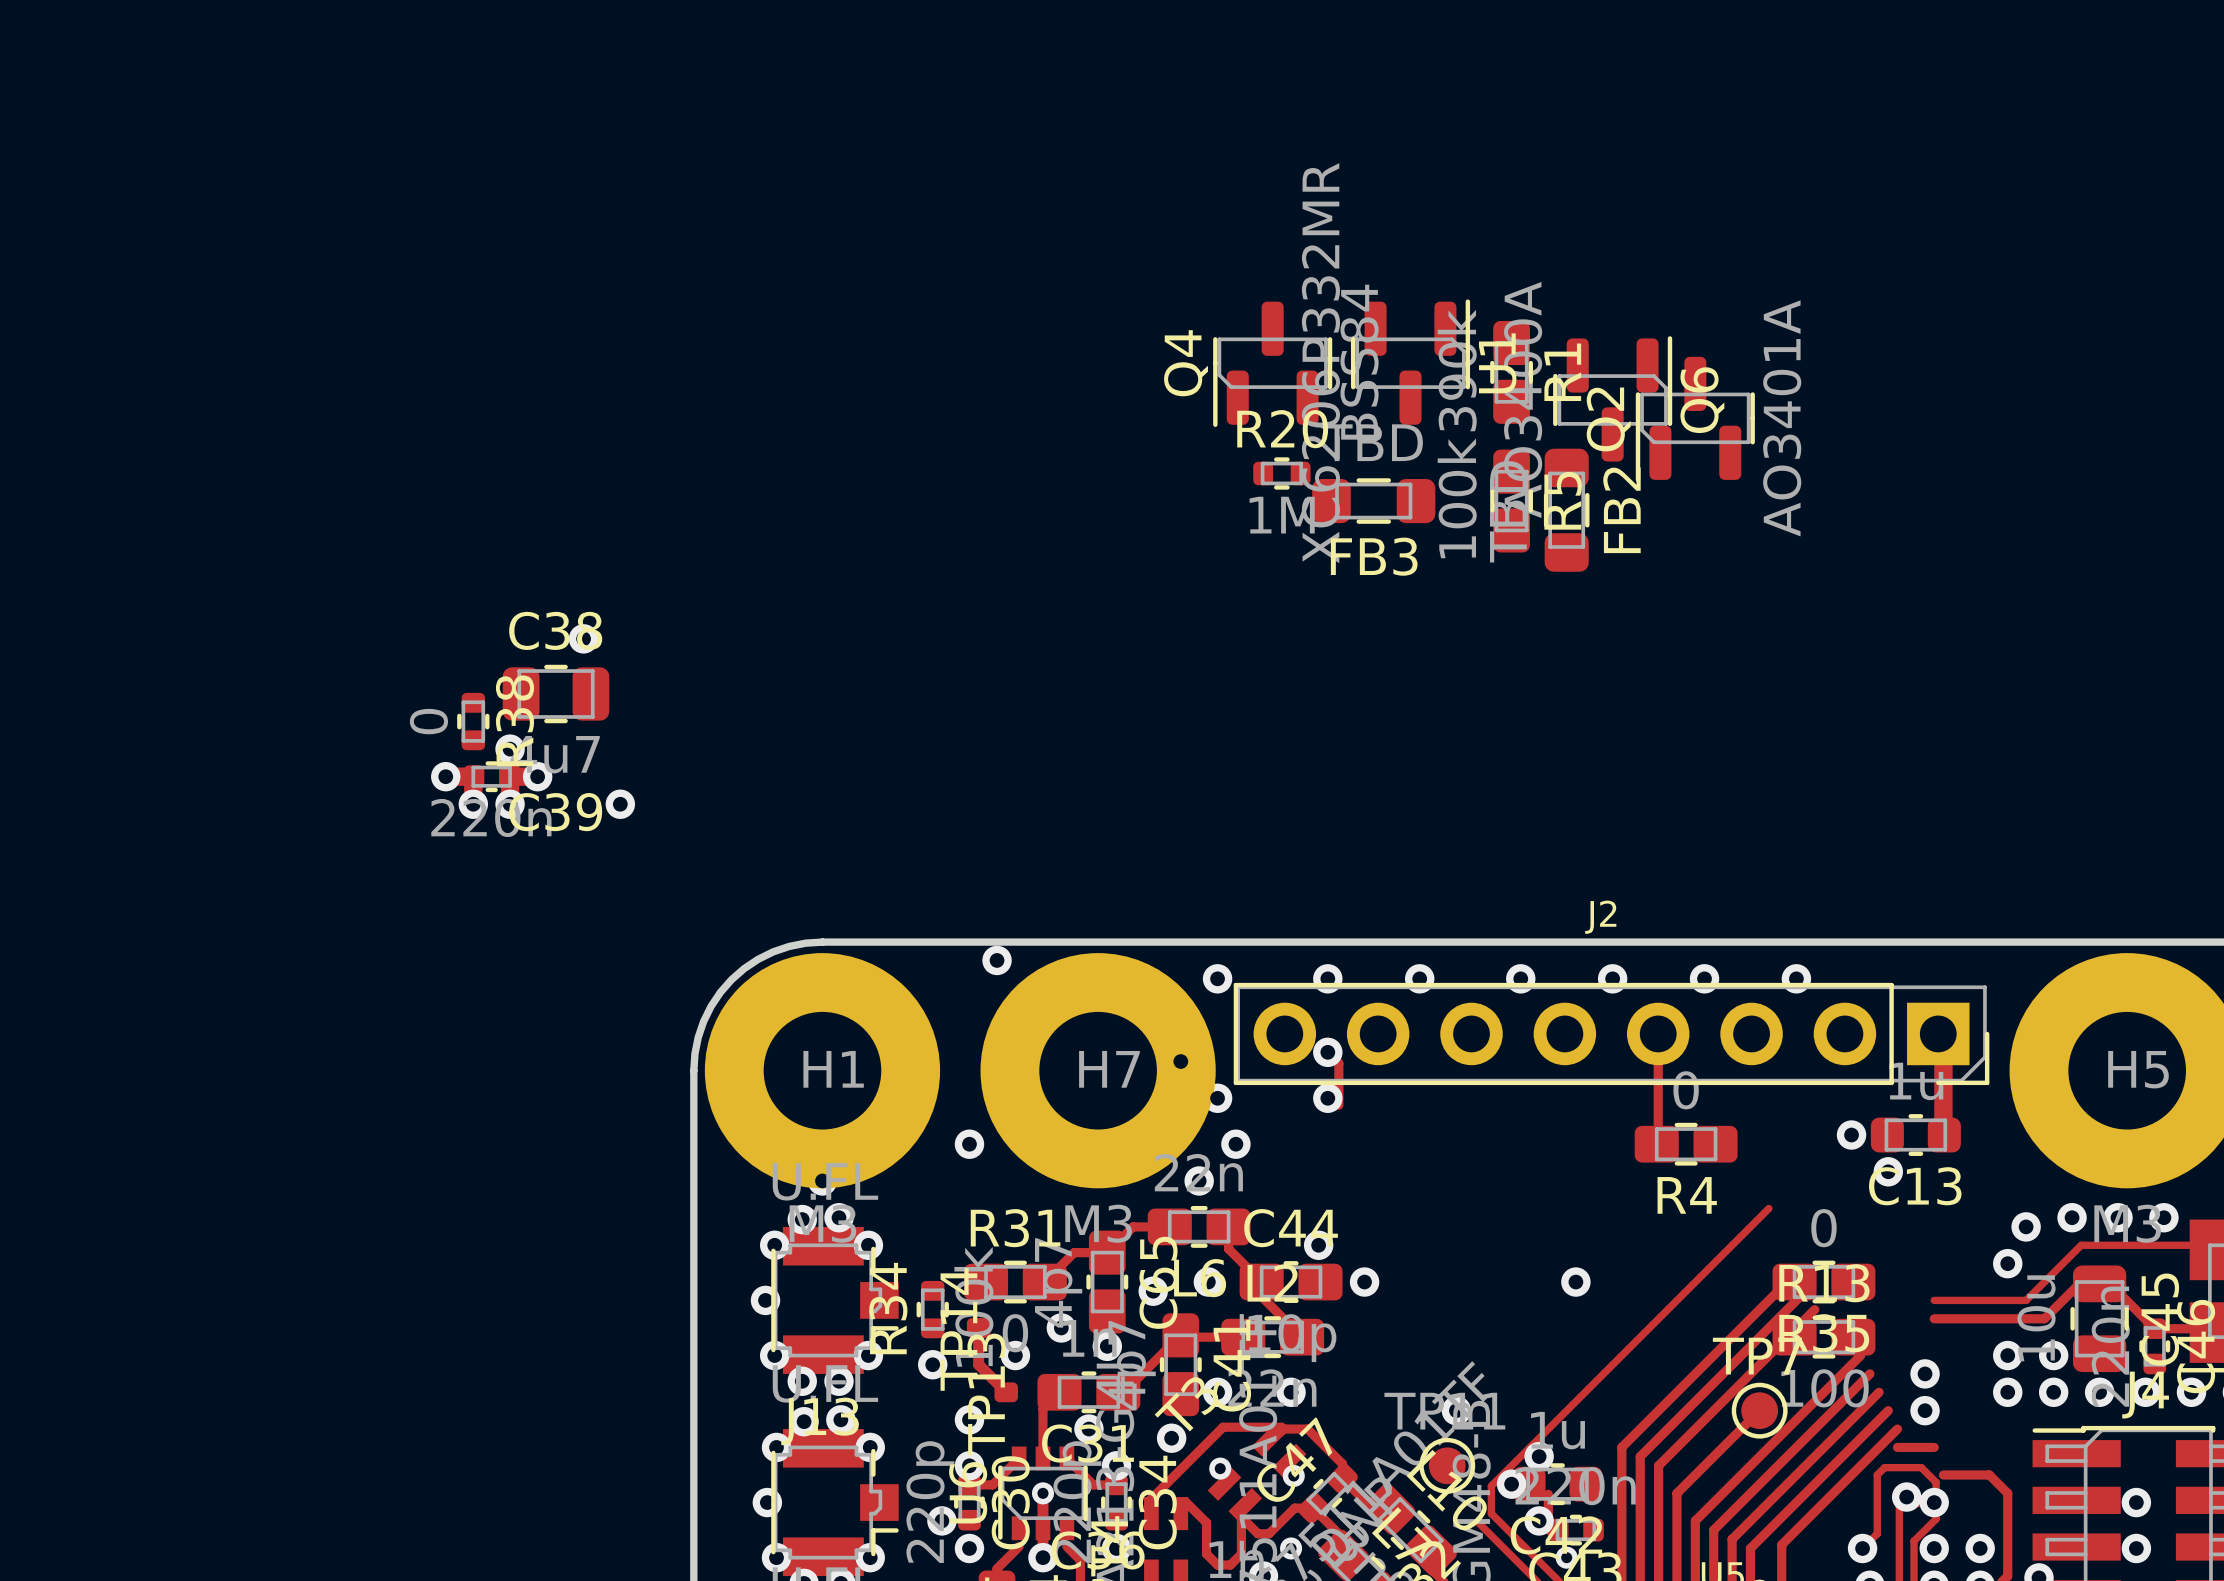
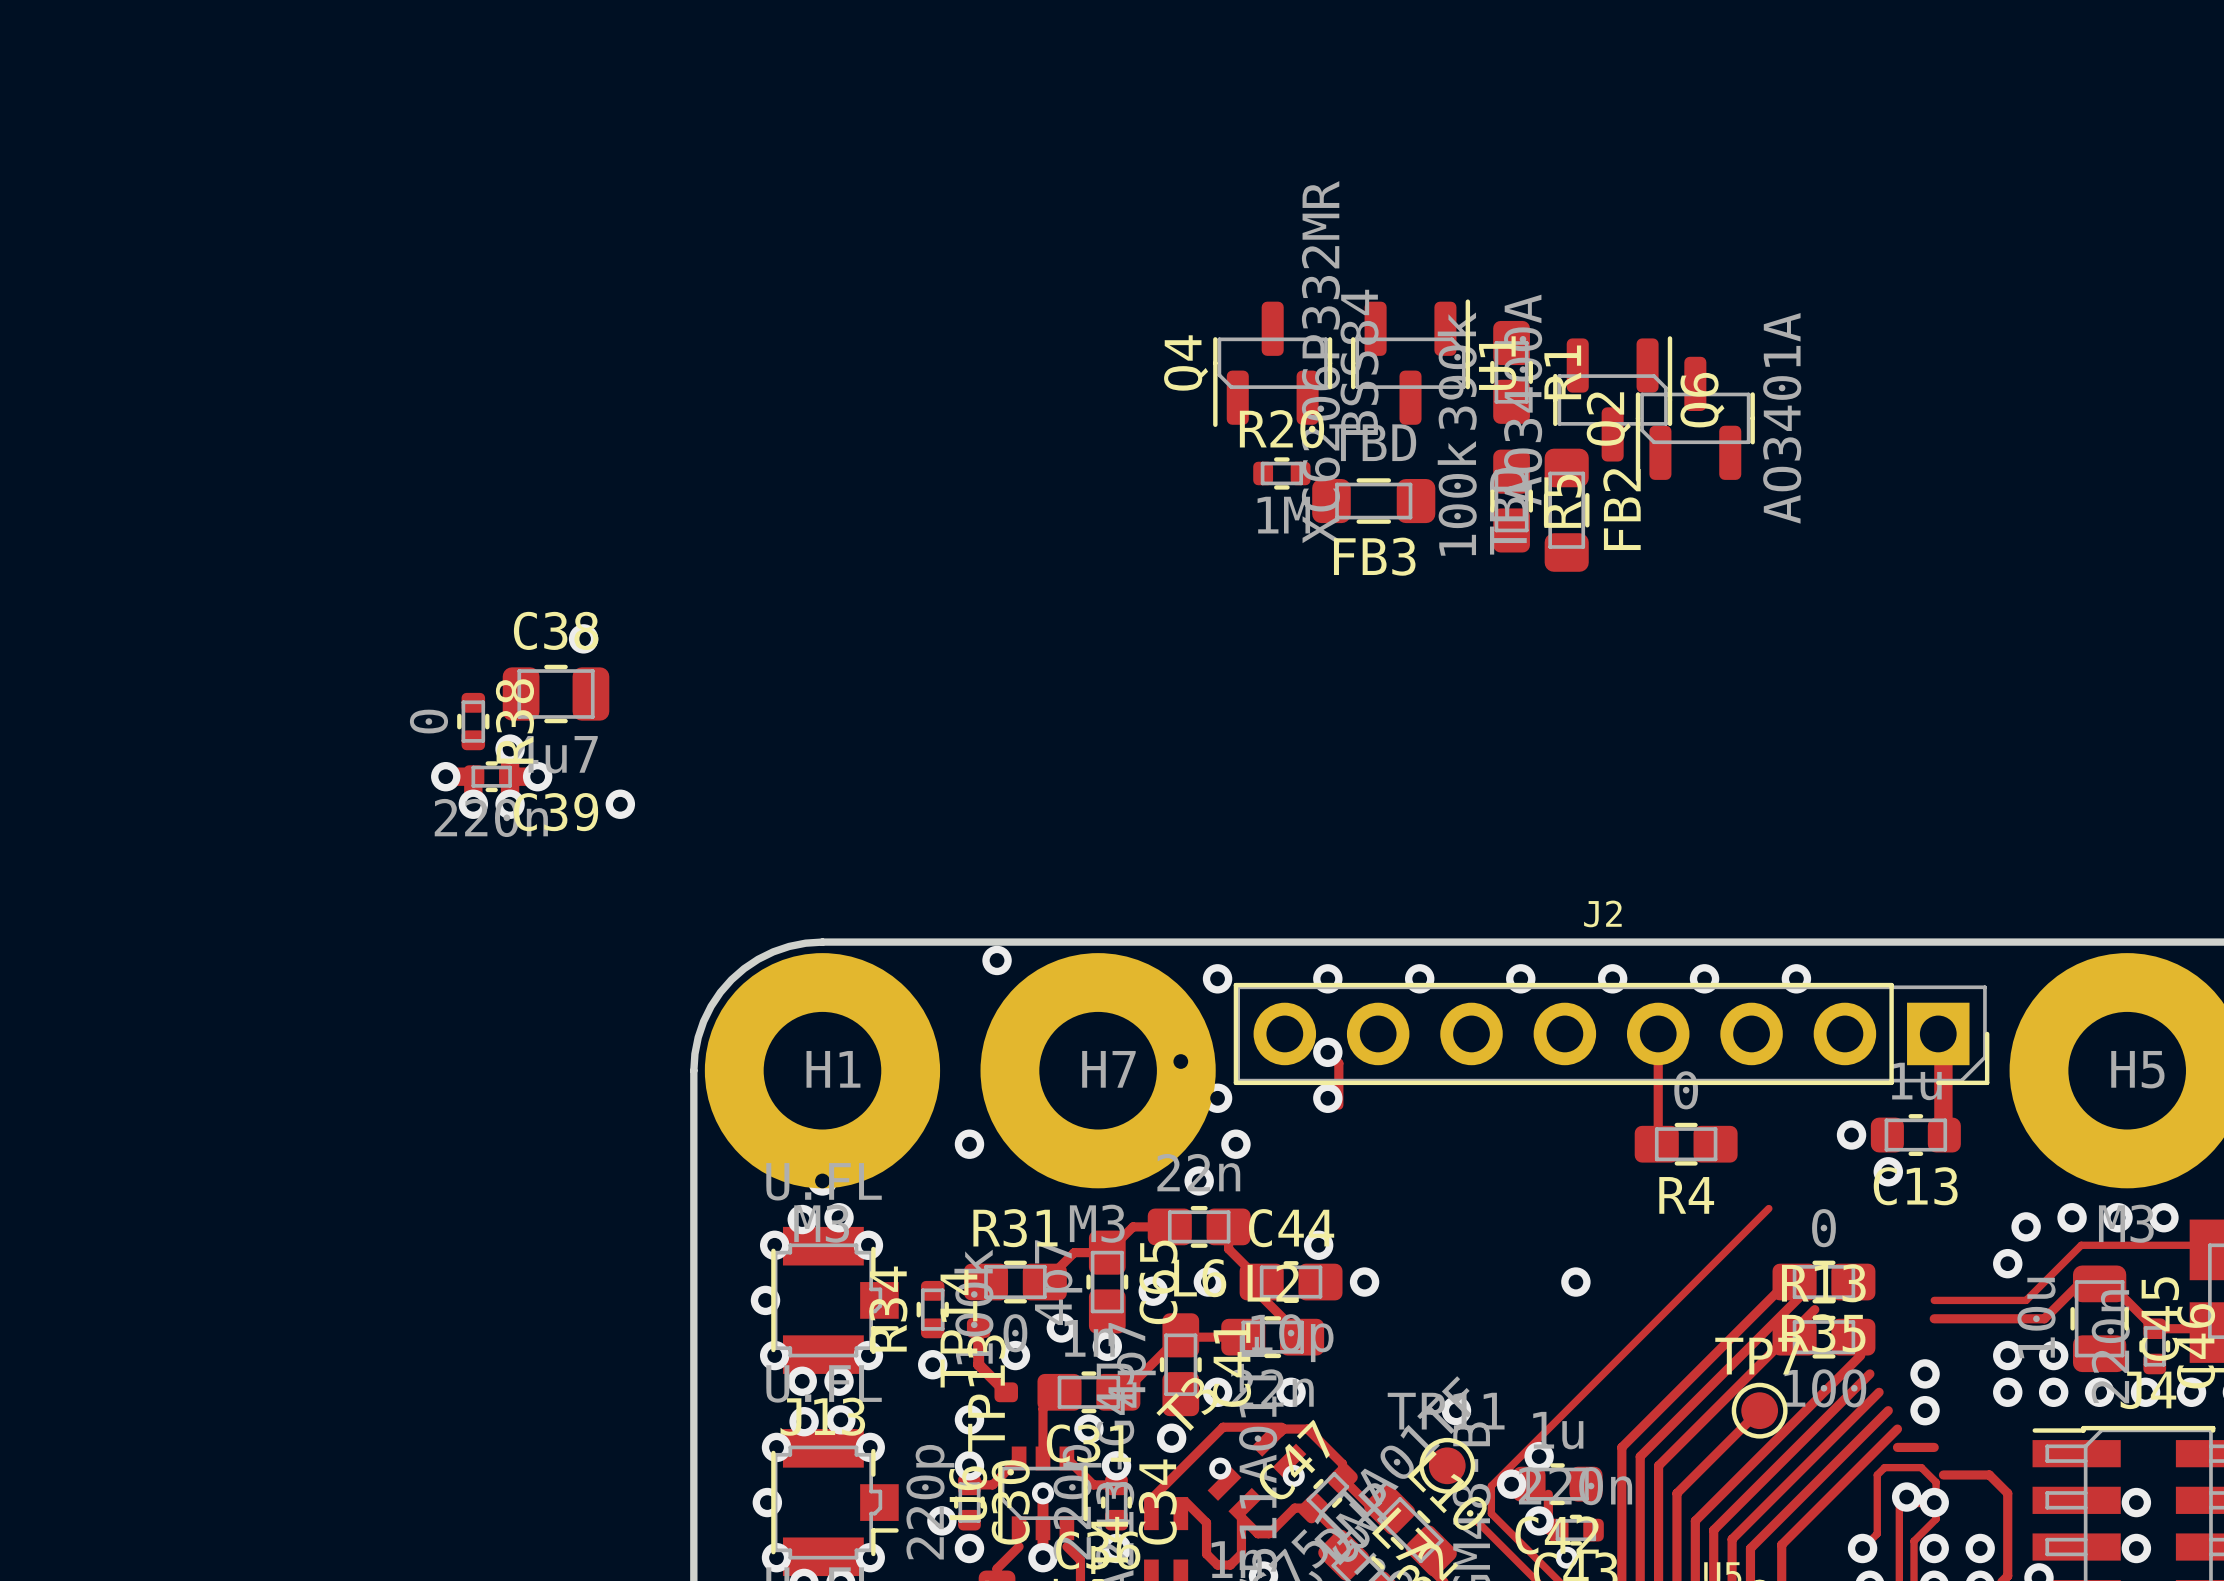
via: (1291, 1548) -> none

